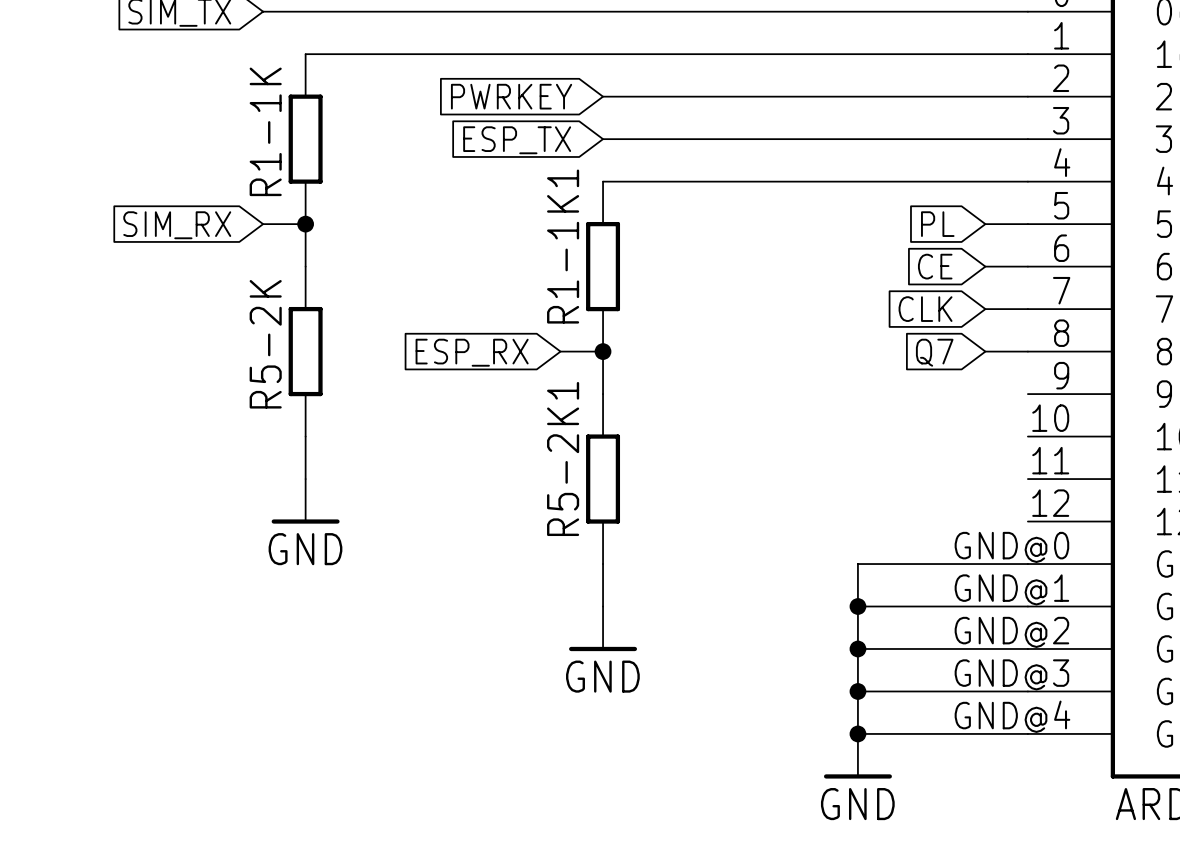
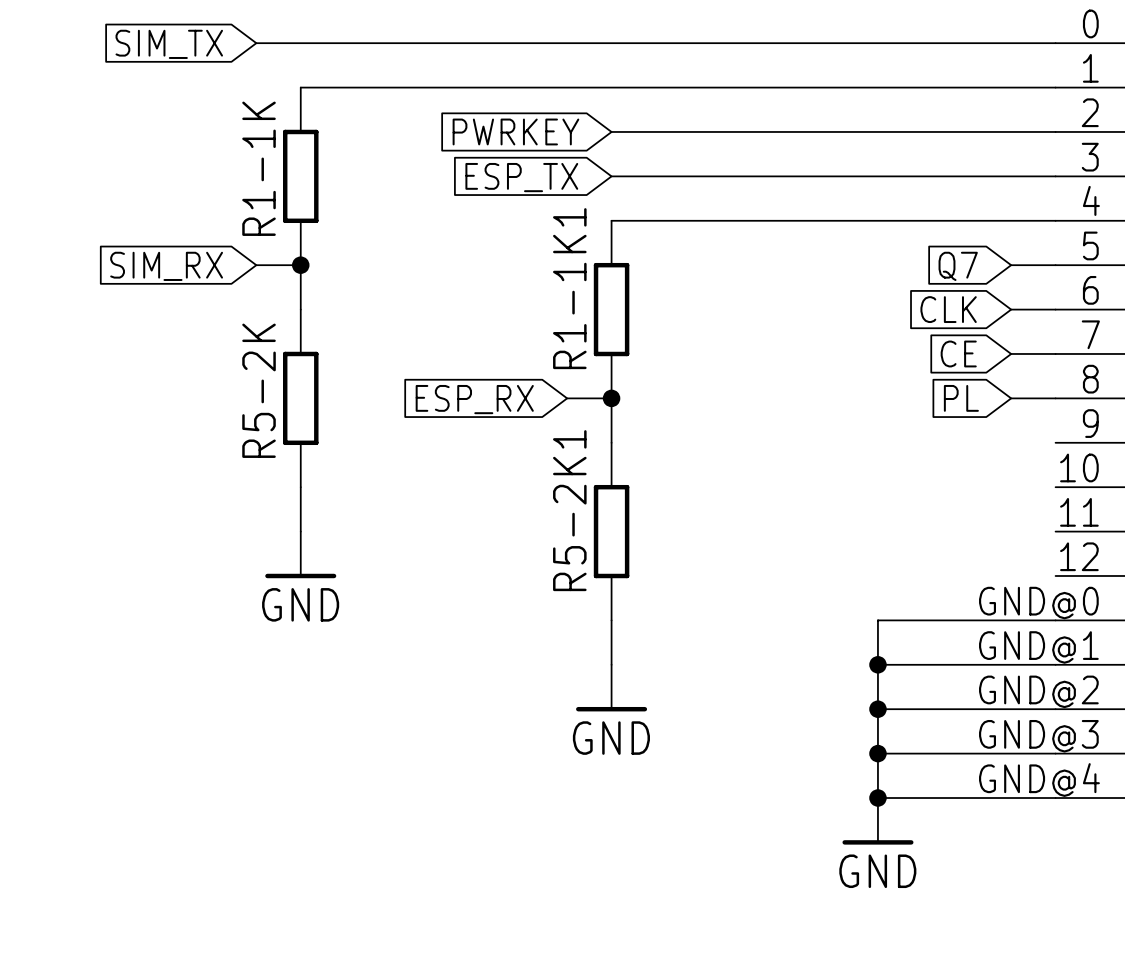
global label: PL (937, 224) -> Q7 (958, 266)
global label: CE (935, 266) -> CLK (948, 309)
global label: CLK (925, 309) -> CE (958, 353)
global label: Q7 (934, 352) -> PL (961, 398)

